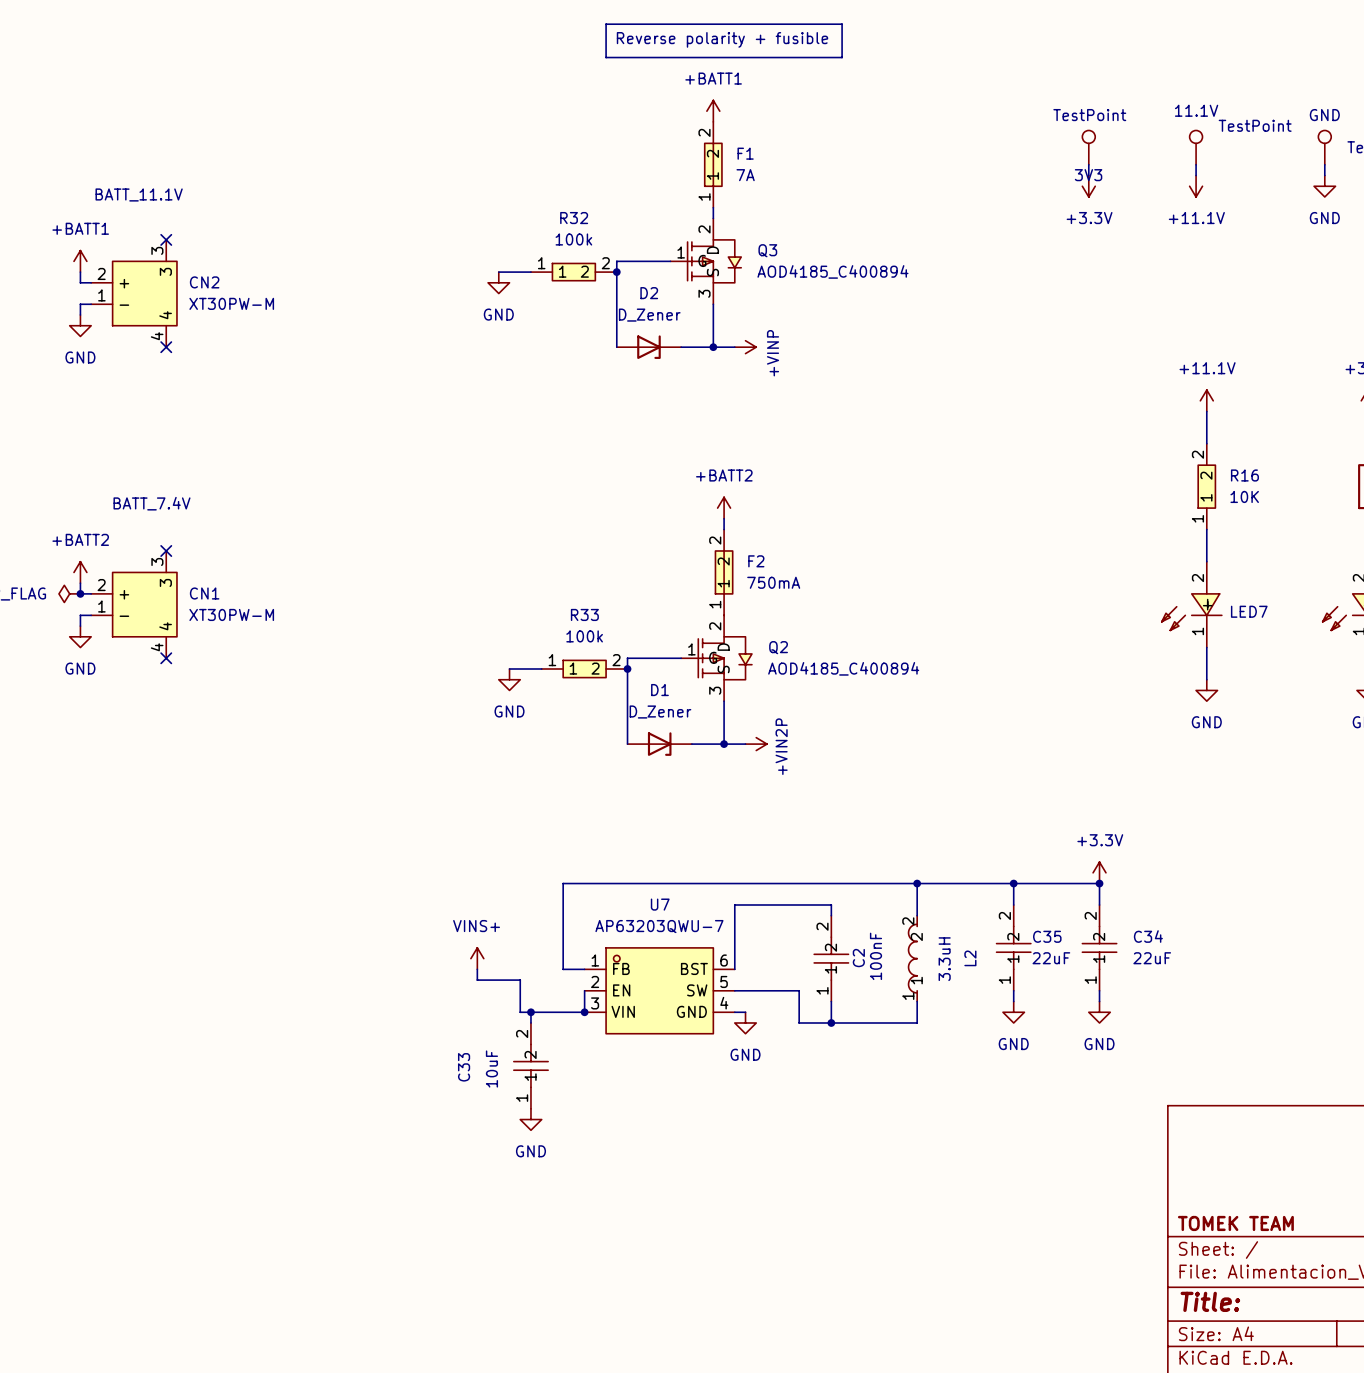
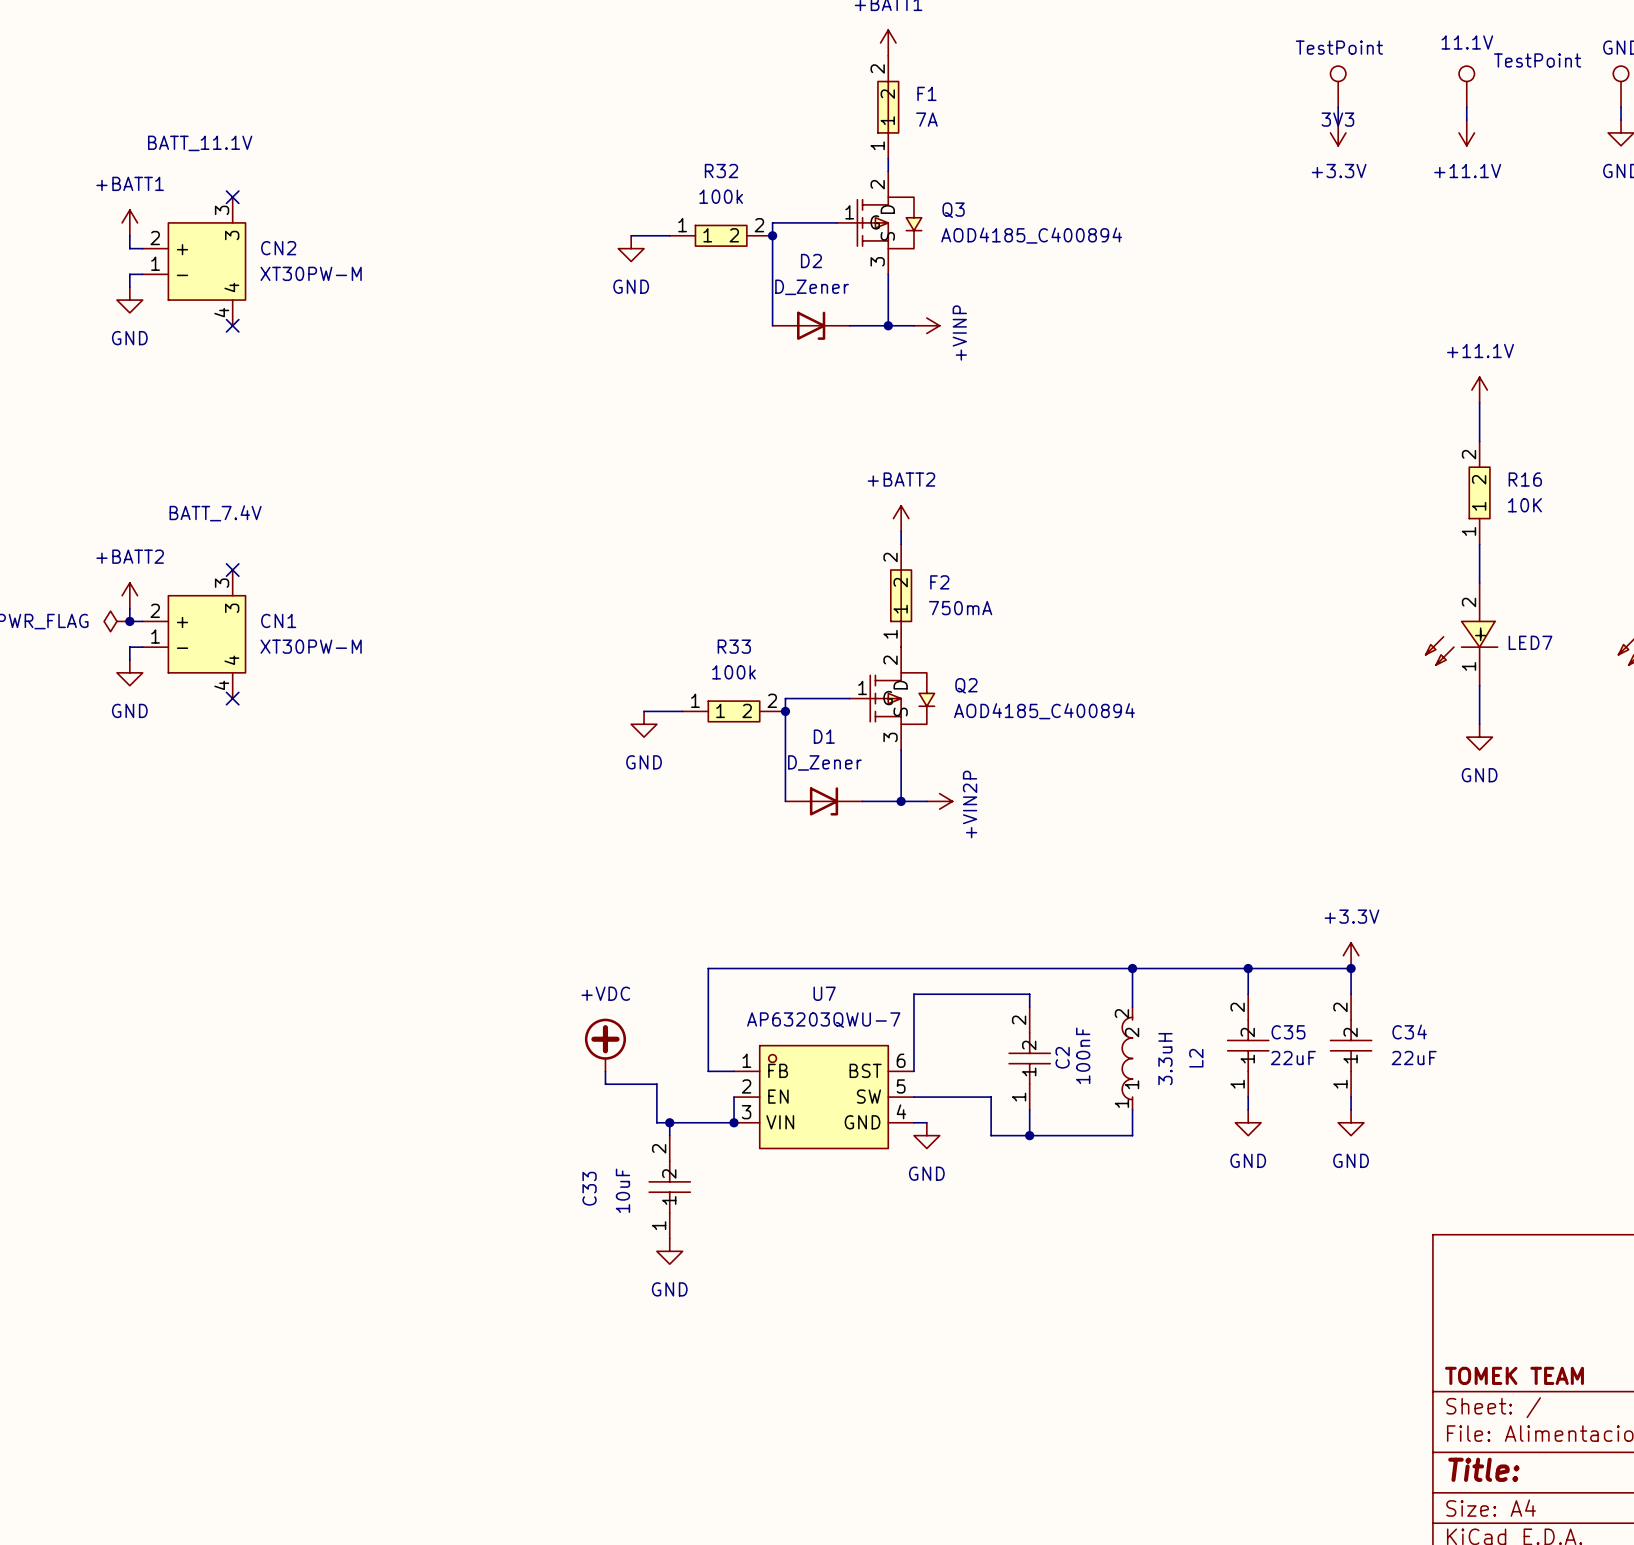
power symbol: none -> +VDC (605, 1045)
power symbol: VINS+ (477, 958) -> none

